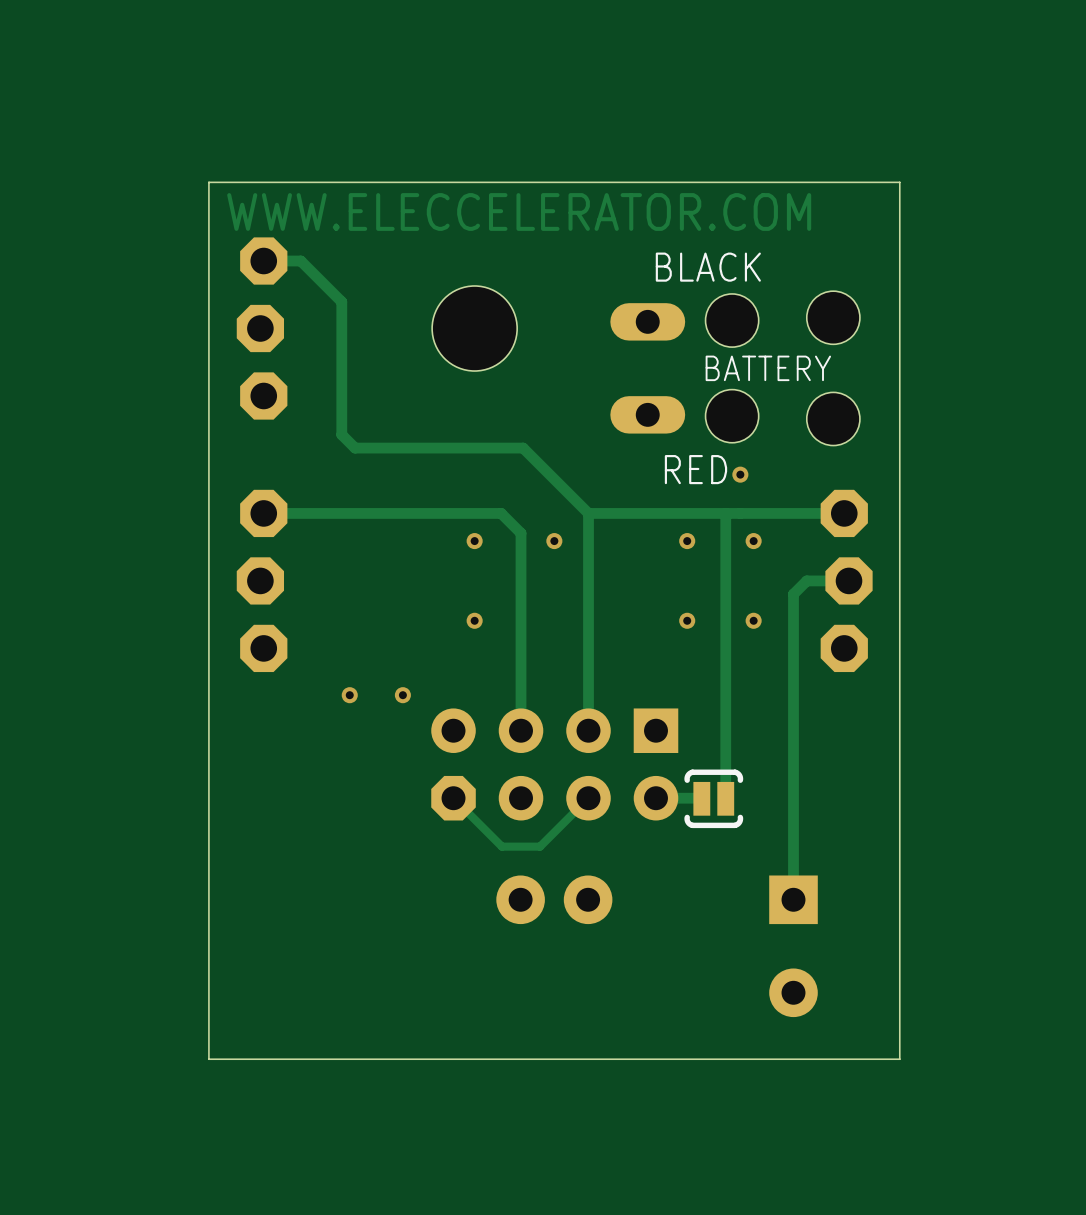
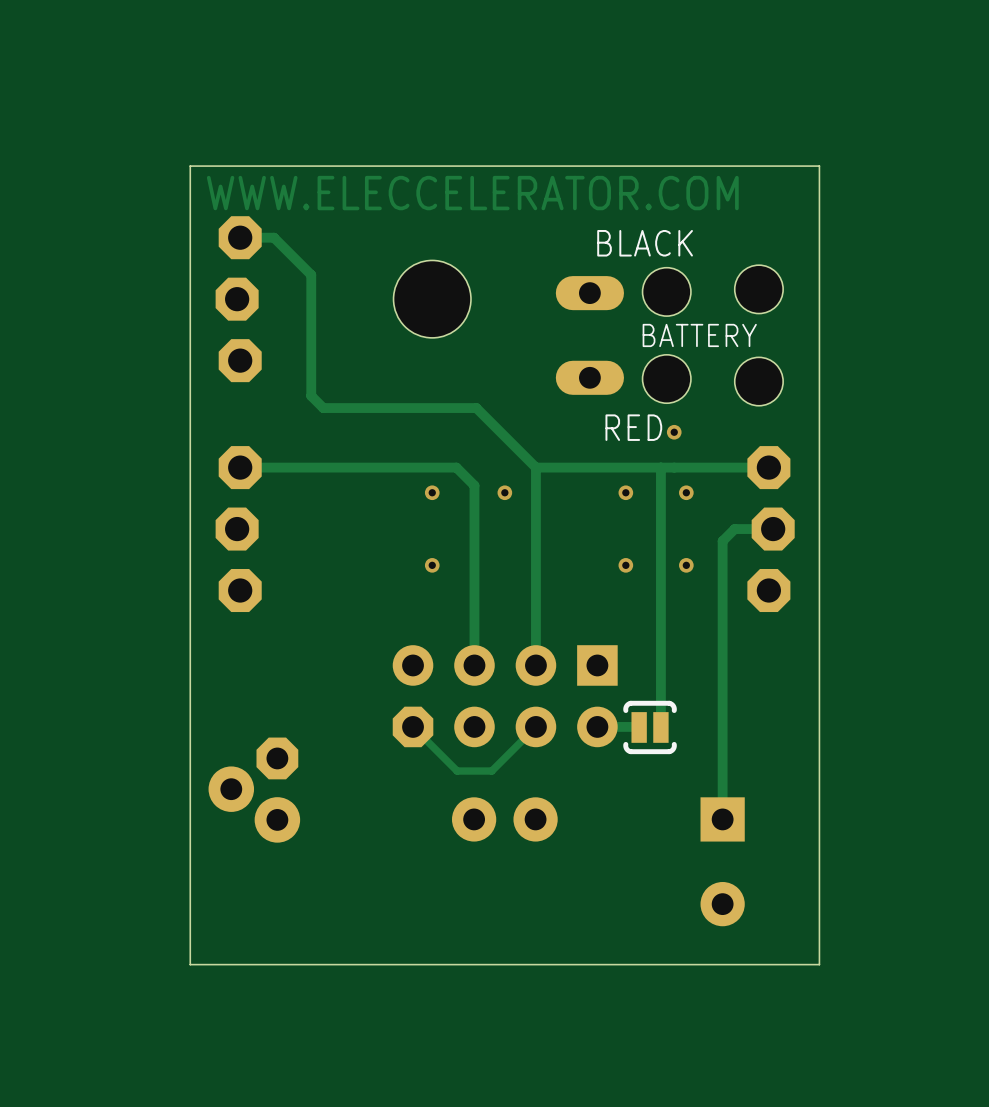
via: (349, 695) -> none
via: (402, 695) -> none
part: none -> (254, 790)

